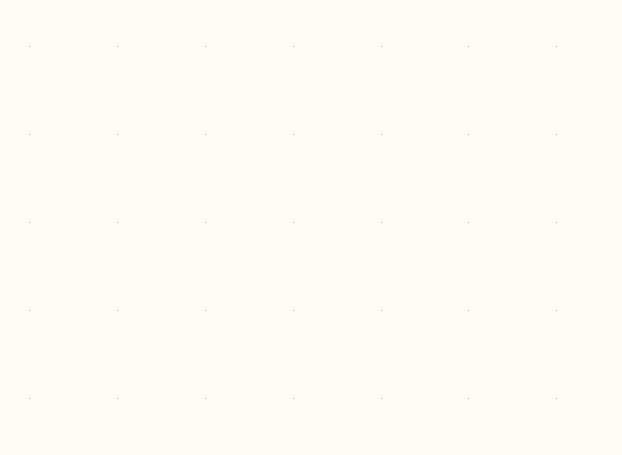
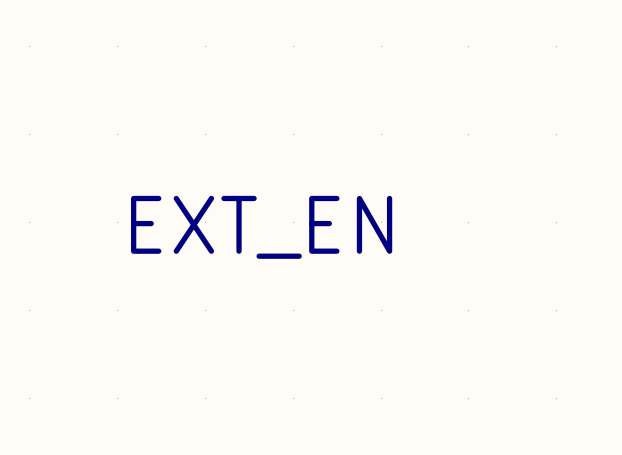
text: none -> EXT_EN (261, 227)

